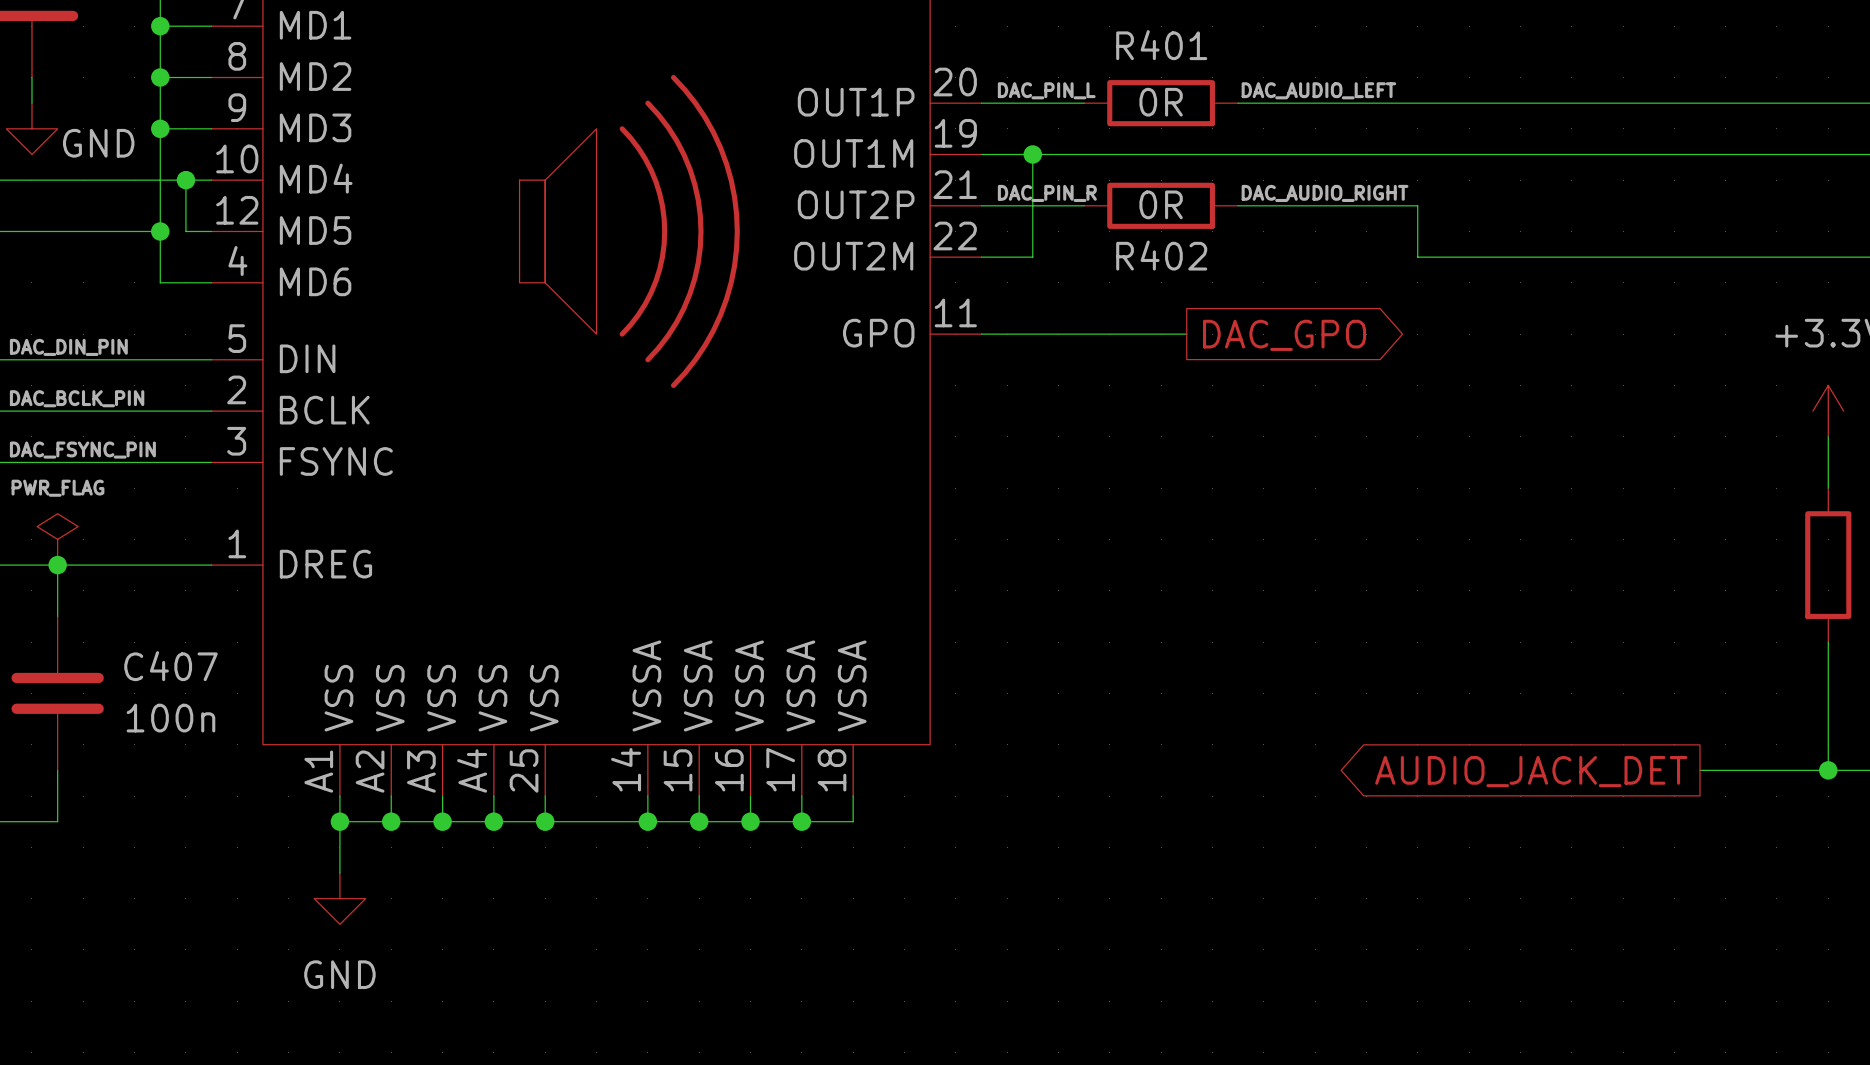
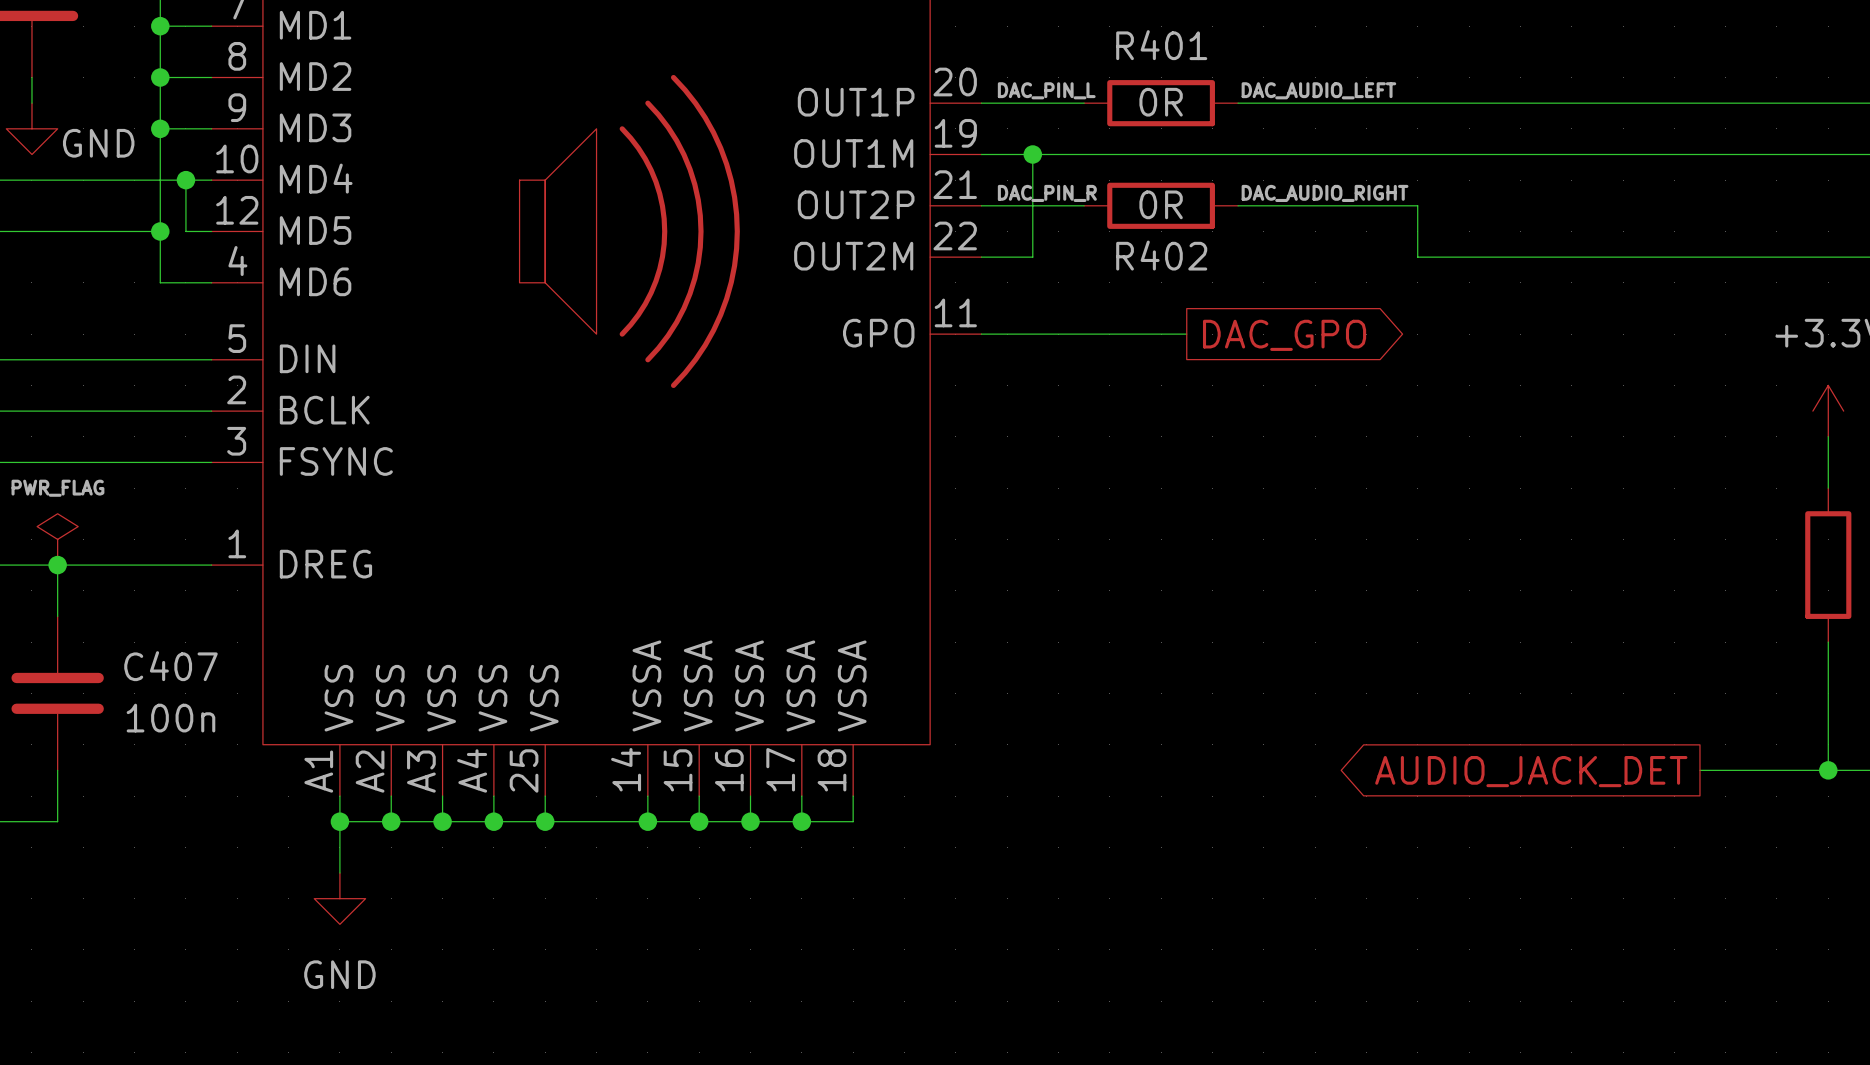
label: DAC_DIN_PIN (68, 347) -> none
label: DAC_BCLK_PIN (77, 398) -> none
label: DAC_FSYNC_PIN (82, 450) -> none

